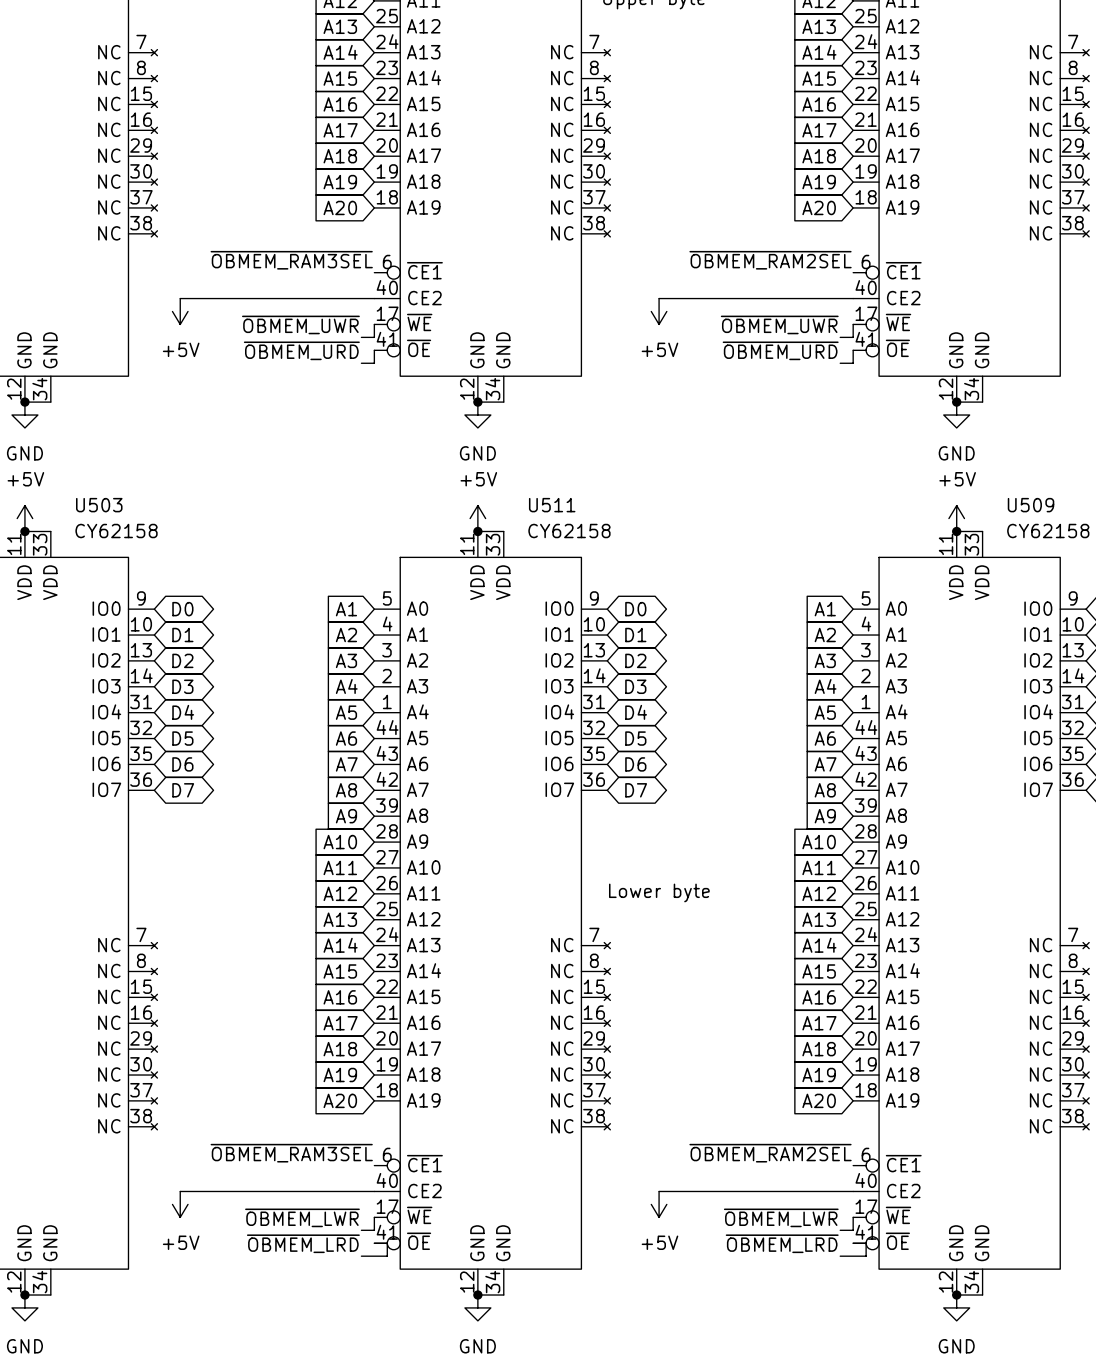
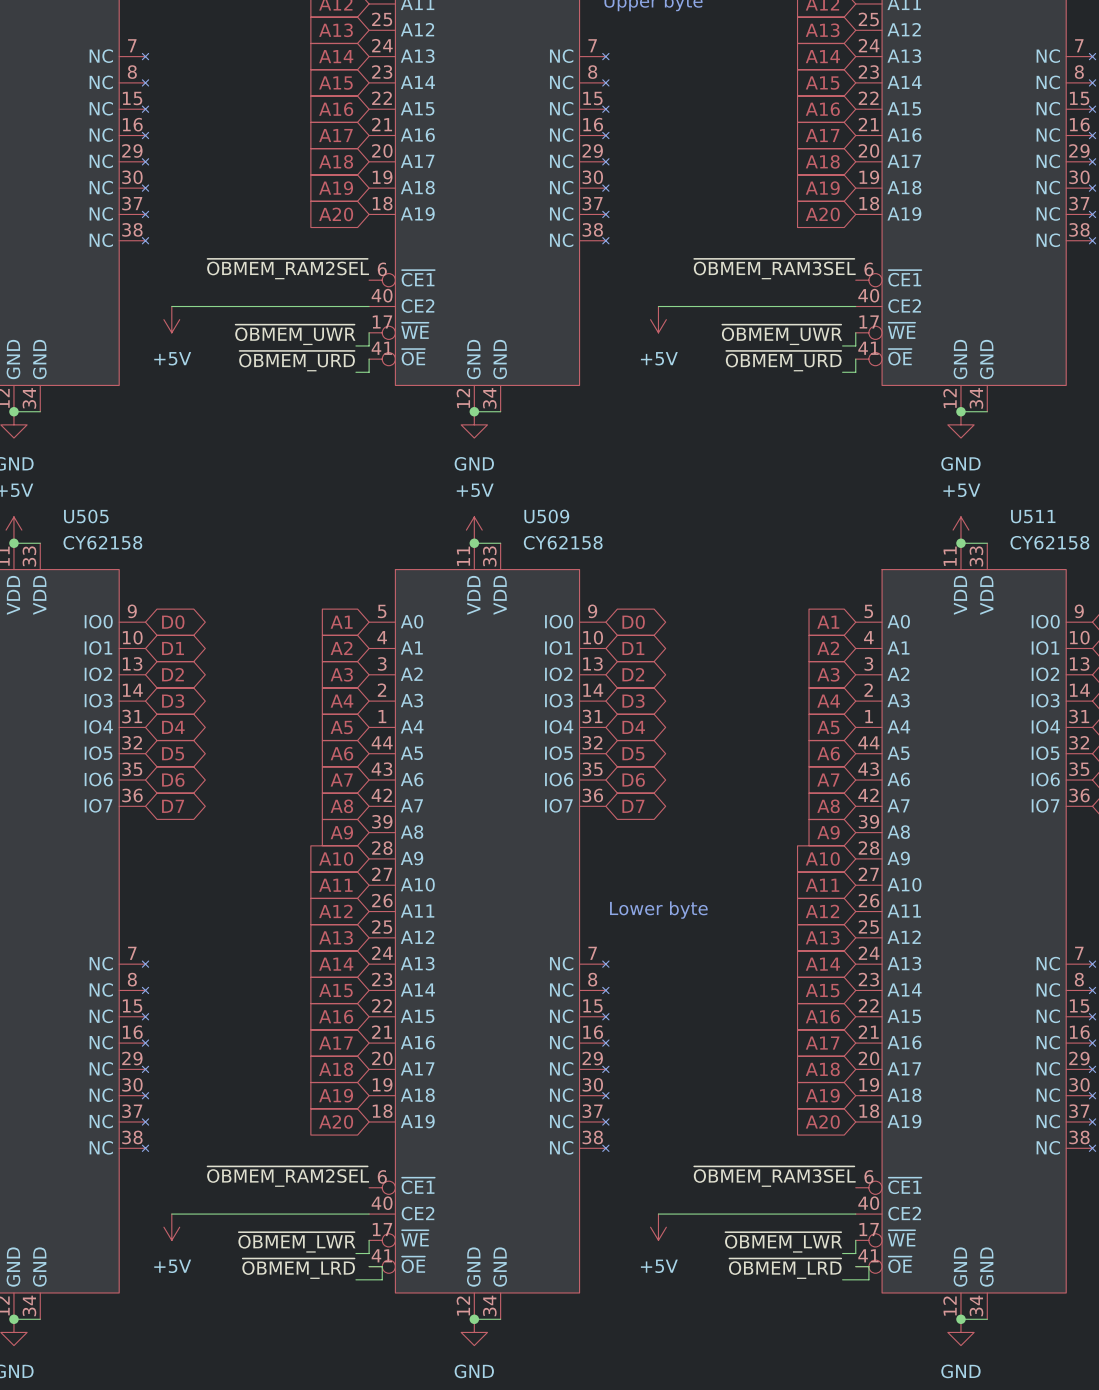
label: ~{OBMEM_RAM3SEL} (291, 260) -> ~{OBMEM_RAM2SEL} (288, 269)
label: ~{OBMEM_RAM2SEL} (770, 260) -> ~{OBMEM_RAM3SEL} (774, 269)
U503 name: U503 (99, 505) -> U505 (86, 516)
U511 name: U511 (552, 505) -> U509 (546, 516)
U509 name: U509 (1031, 505) -> U511 (1033, 516)
label: ~{OBMEM_RAM3SEL} (291, 1153) -> ~{OBMEM_RAM2SEL} (288, 1176)
label: ~{OBMEM_RAM2SEL} (770, 1153) -> ~{OBMEM_RAM3SEL} (774, 1176)

